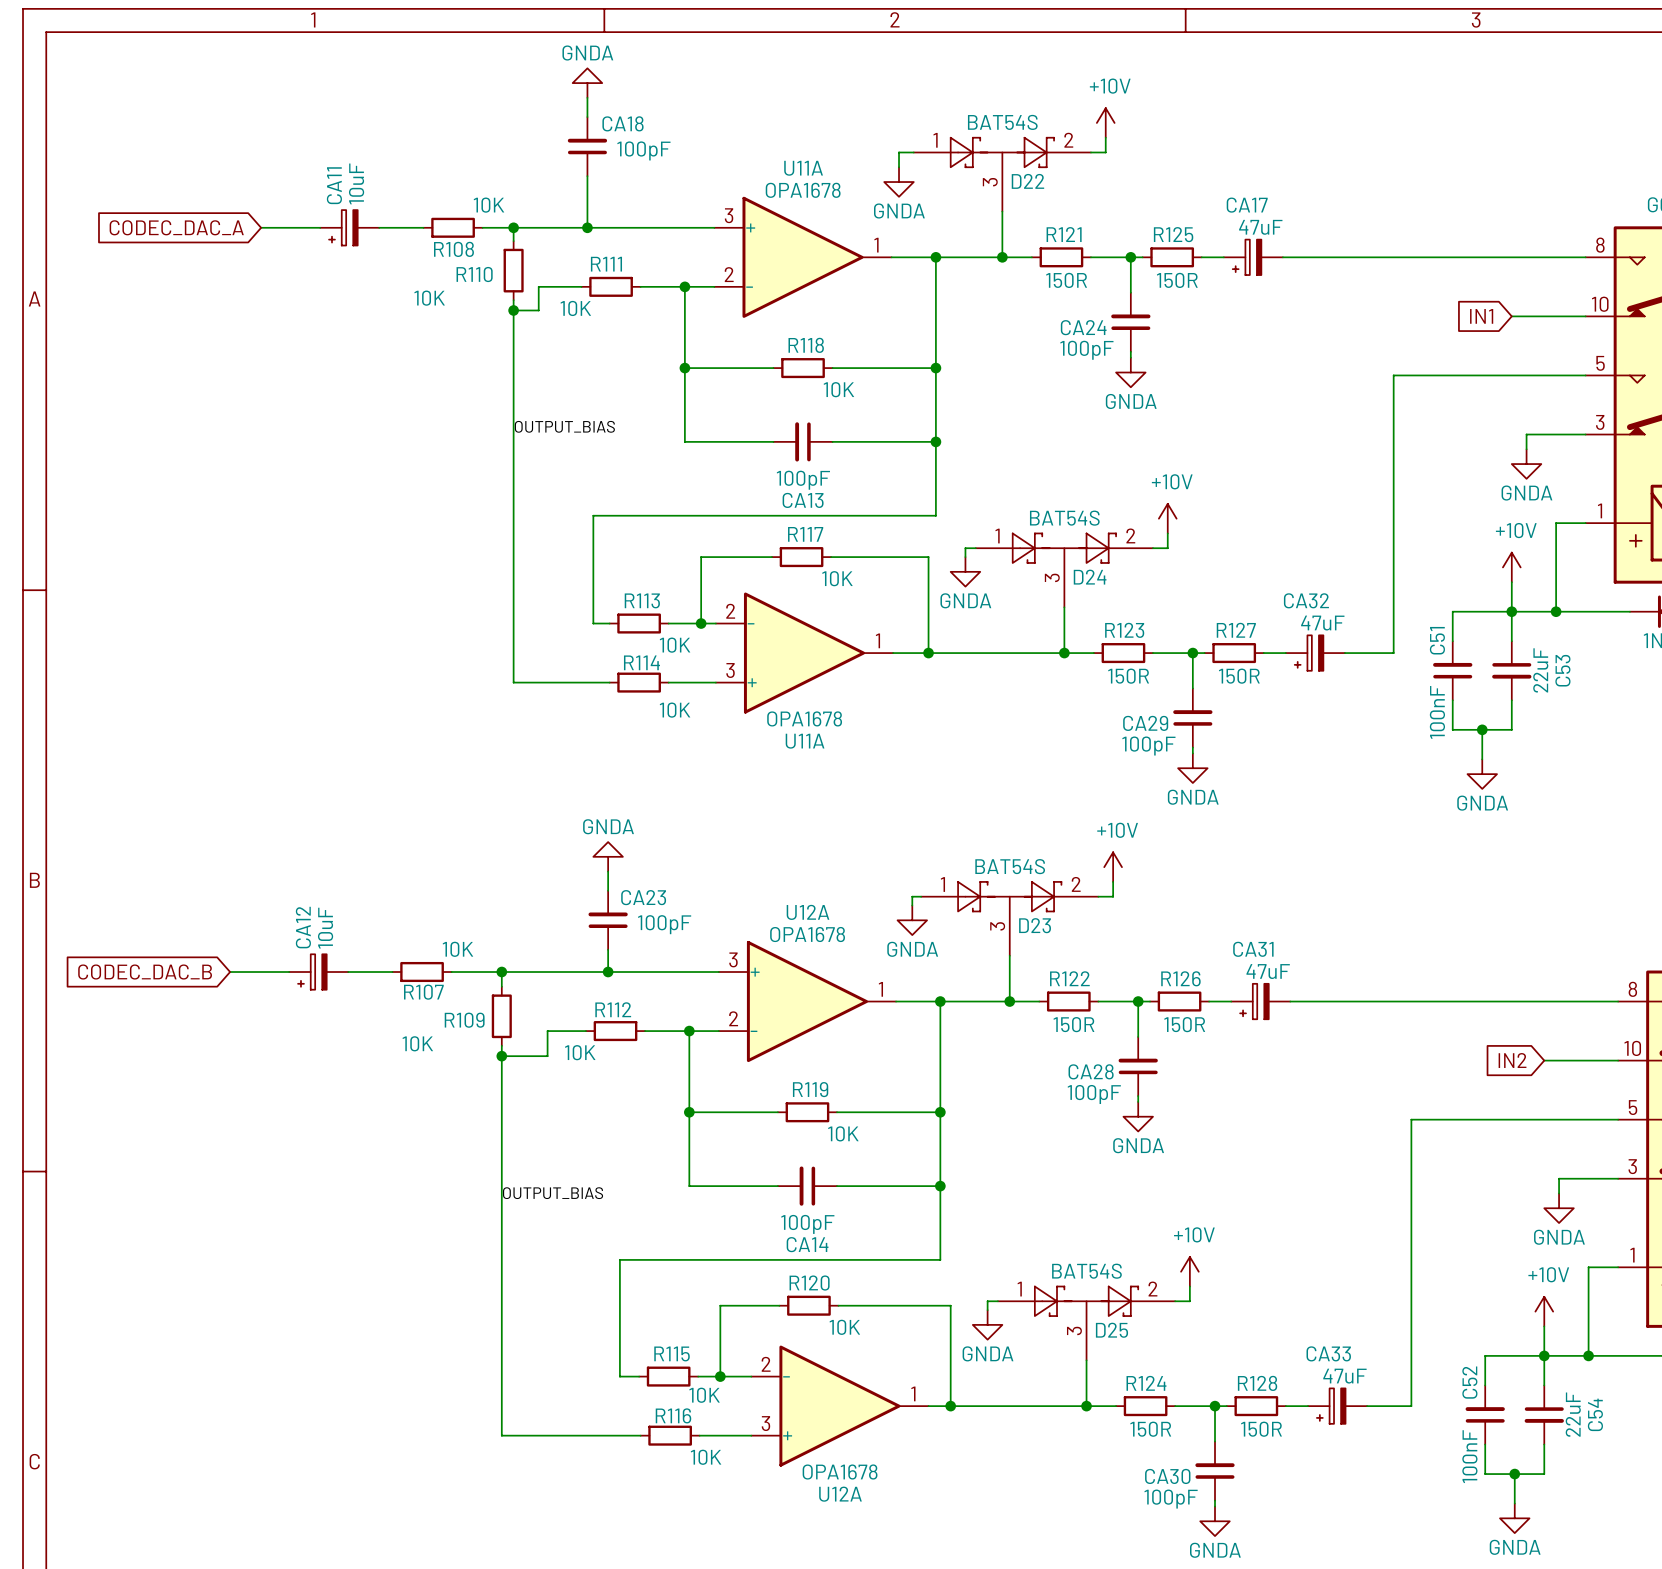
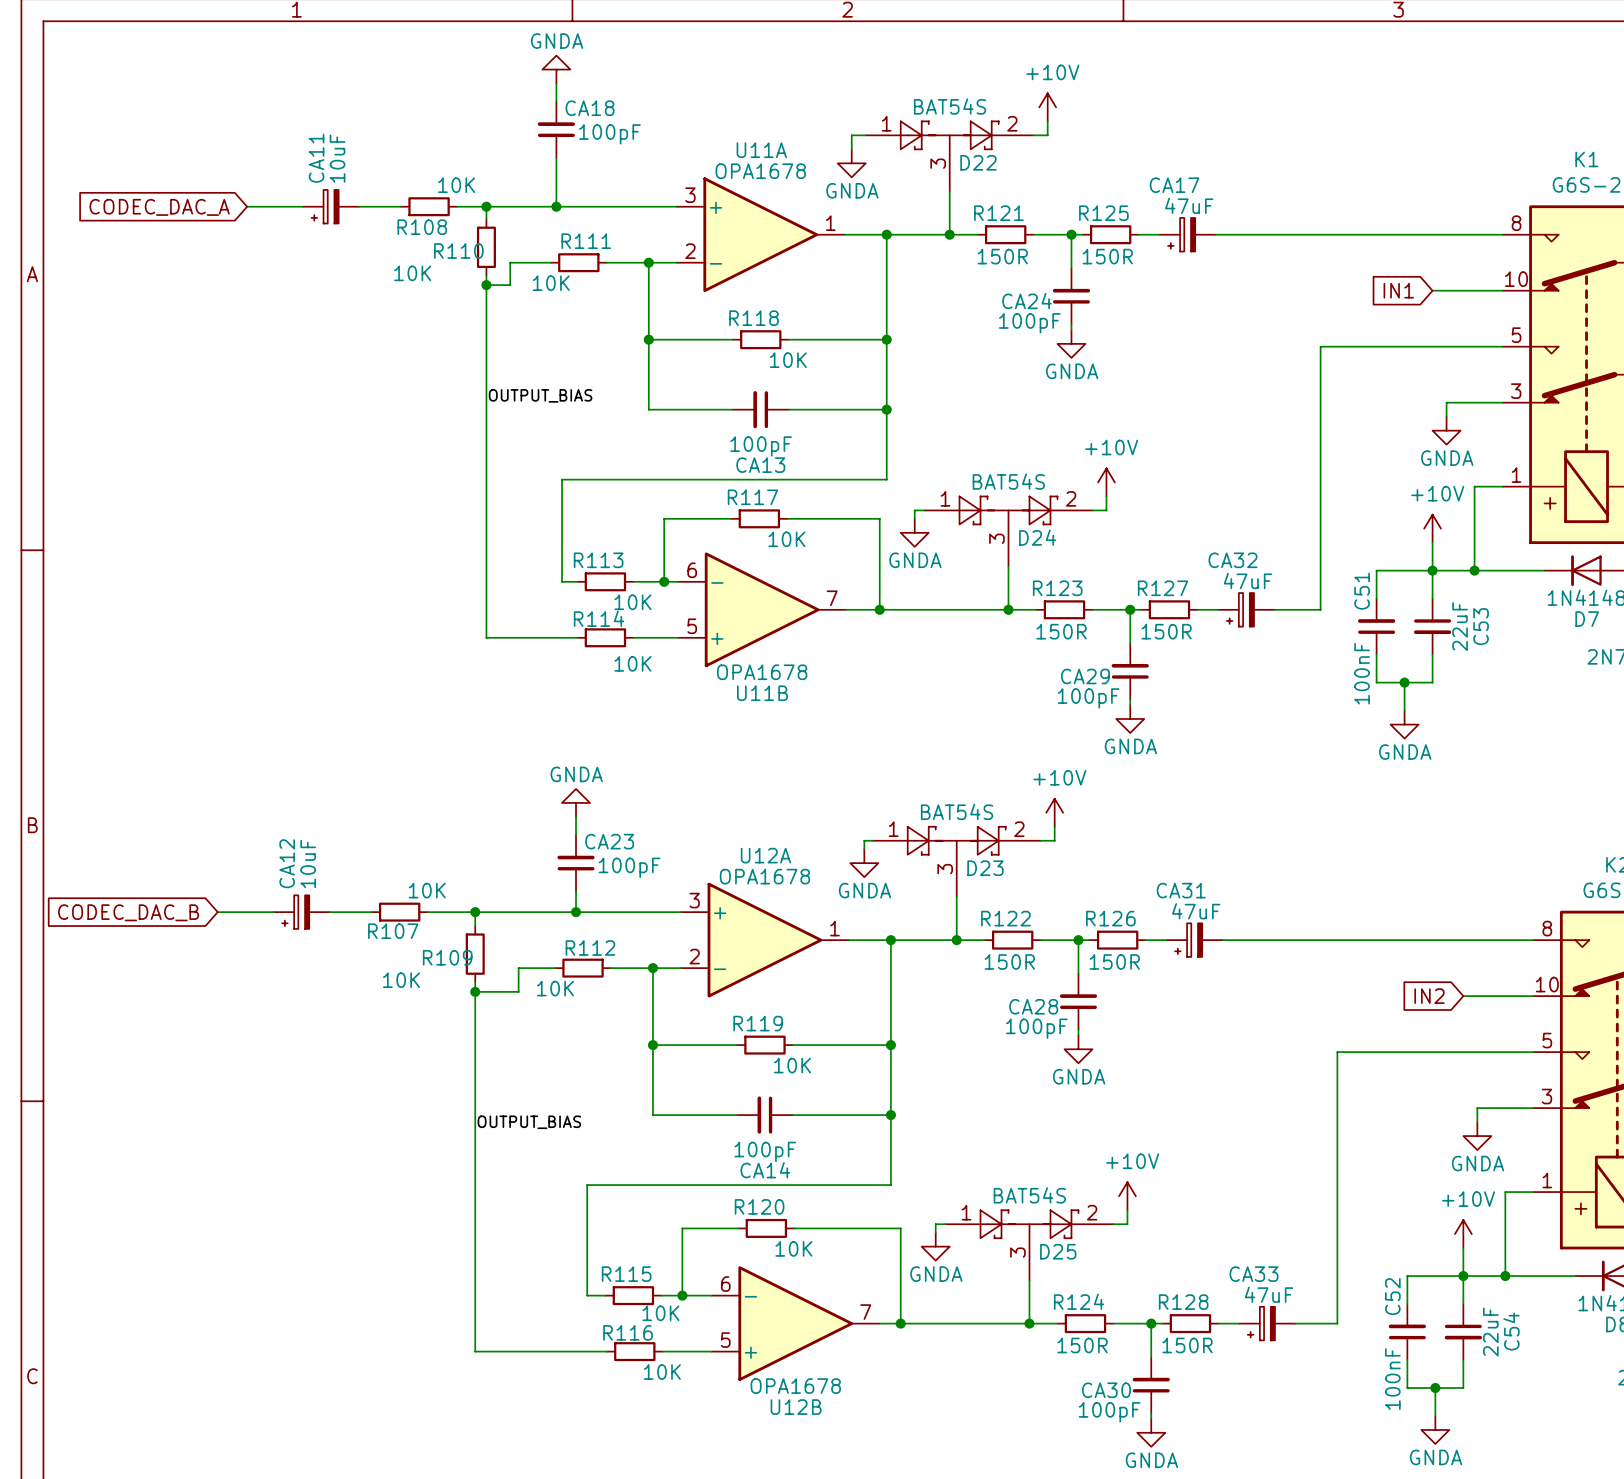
U11A pin number: 2 (730, 611) -> 6 (692, 570)
U11A pin number: 1 (877, 640) -> 7 (832, 598)
U11A pin number: 3 (730, 670) -> 5 (692, 626)
U11A name: U11A (805, 741) -> U11B (762, 693)
U12A pin number: 2 (766, 1364) -> 6 (725, 1284)
U12A pin number: 1 (913, 1393) -> 7 (865, 1312)
U12A pin number: 3 (765, 1423) -> 5 (725, 1340)
U12A name: U12A (840, 1494) -> U12B (796, 1407)

